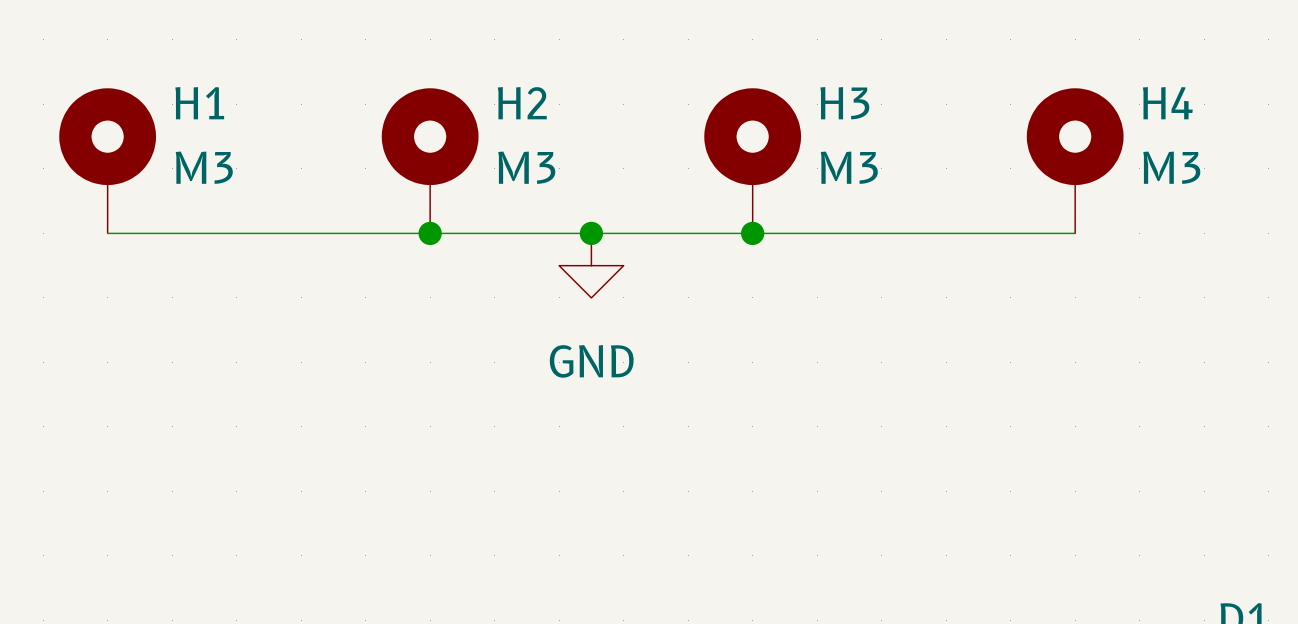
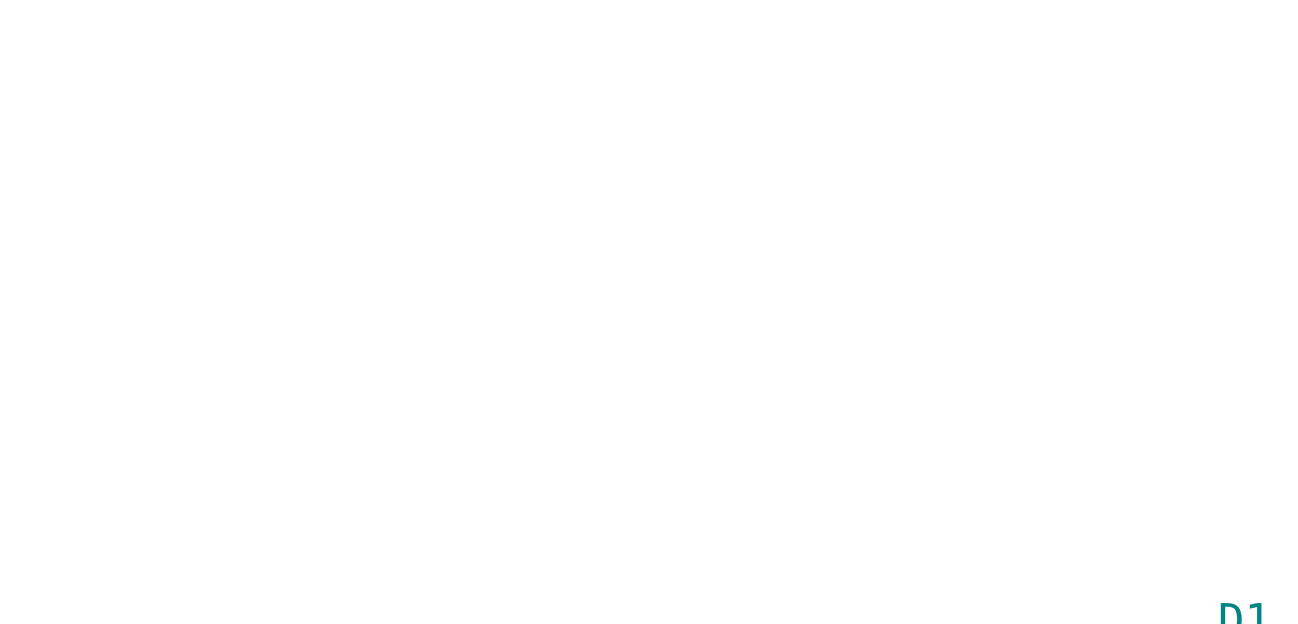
H1: M3 (107, 160) -> none
H2: M3 (430, 160) -> none
H3: M3 (752, 160) -> none
H4: M3 (1075, 160) -> none
wire: (107, 233) (1075, 233) -> none
junction: (430, 233) -> none
junction: (591, 233) -> none
junction: (752, 233) -> none
power symbol: GND (591, 265) -> none

